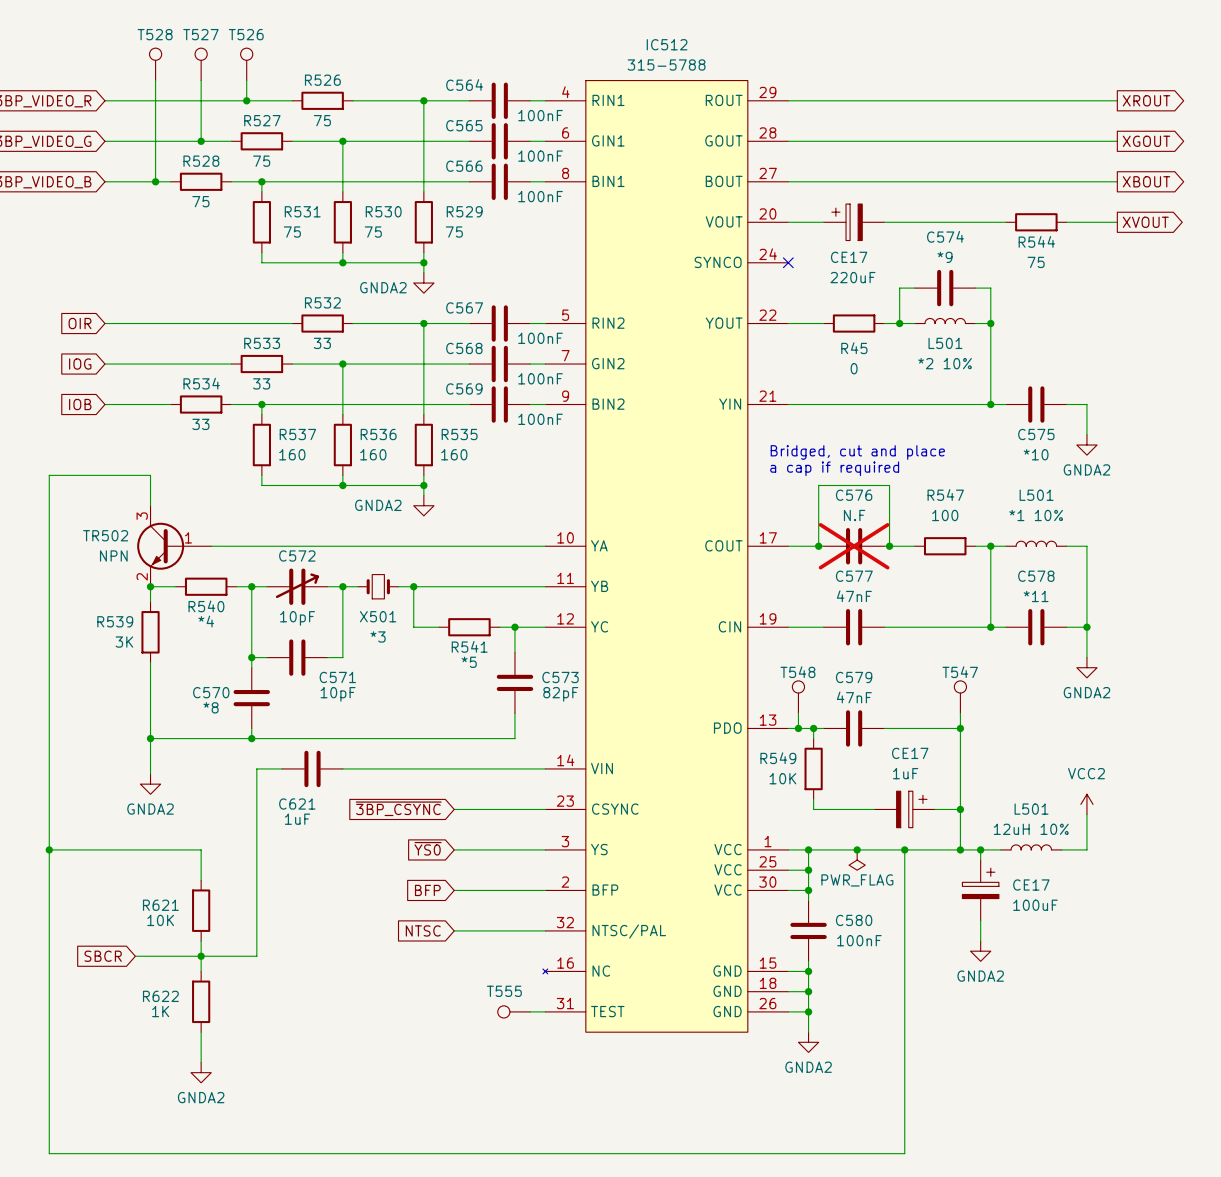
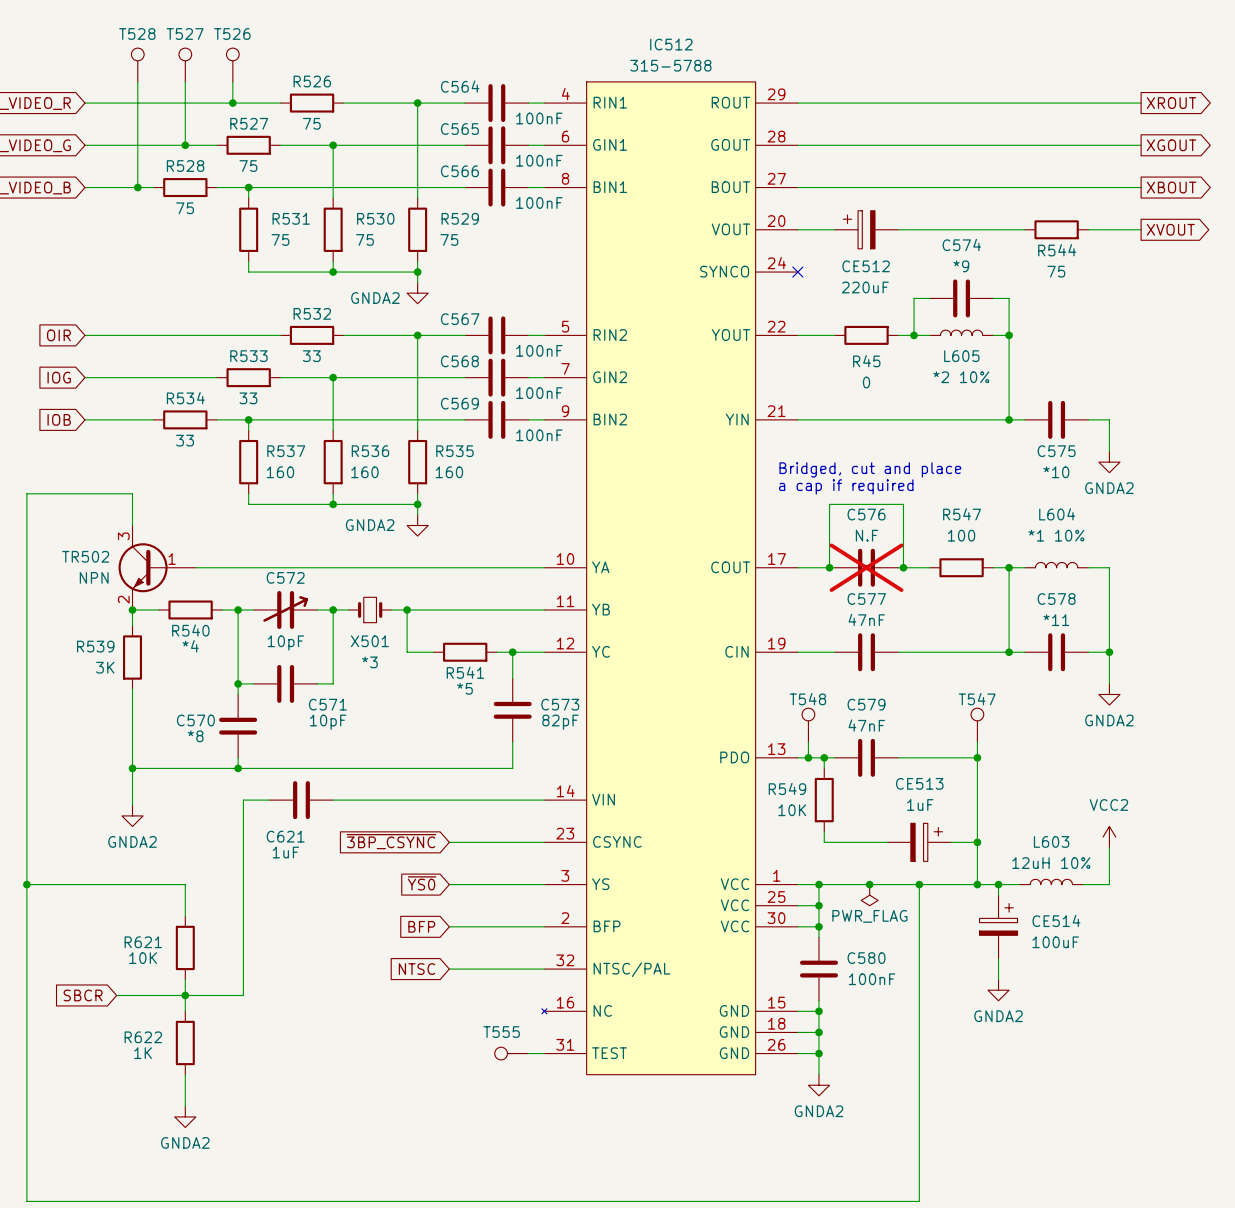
CE17 name: CE17 (849, 257) -> CE512 (866, 266)
L501 name: L501 (945, 343) -> L605 (961, 356)
L501 name: L501 (1036, 495) -> L604 (1057, 514)
CE17 name: CE17 (910, 753) -> CE513 (919, 783)
L501 name: L501 (1031, 809) -> L603 (1051, 841)
CE17 name: CE17 (1031, 885) -> CE514 (1056, 920)

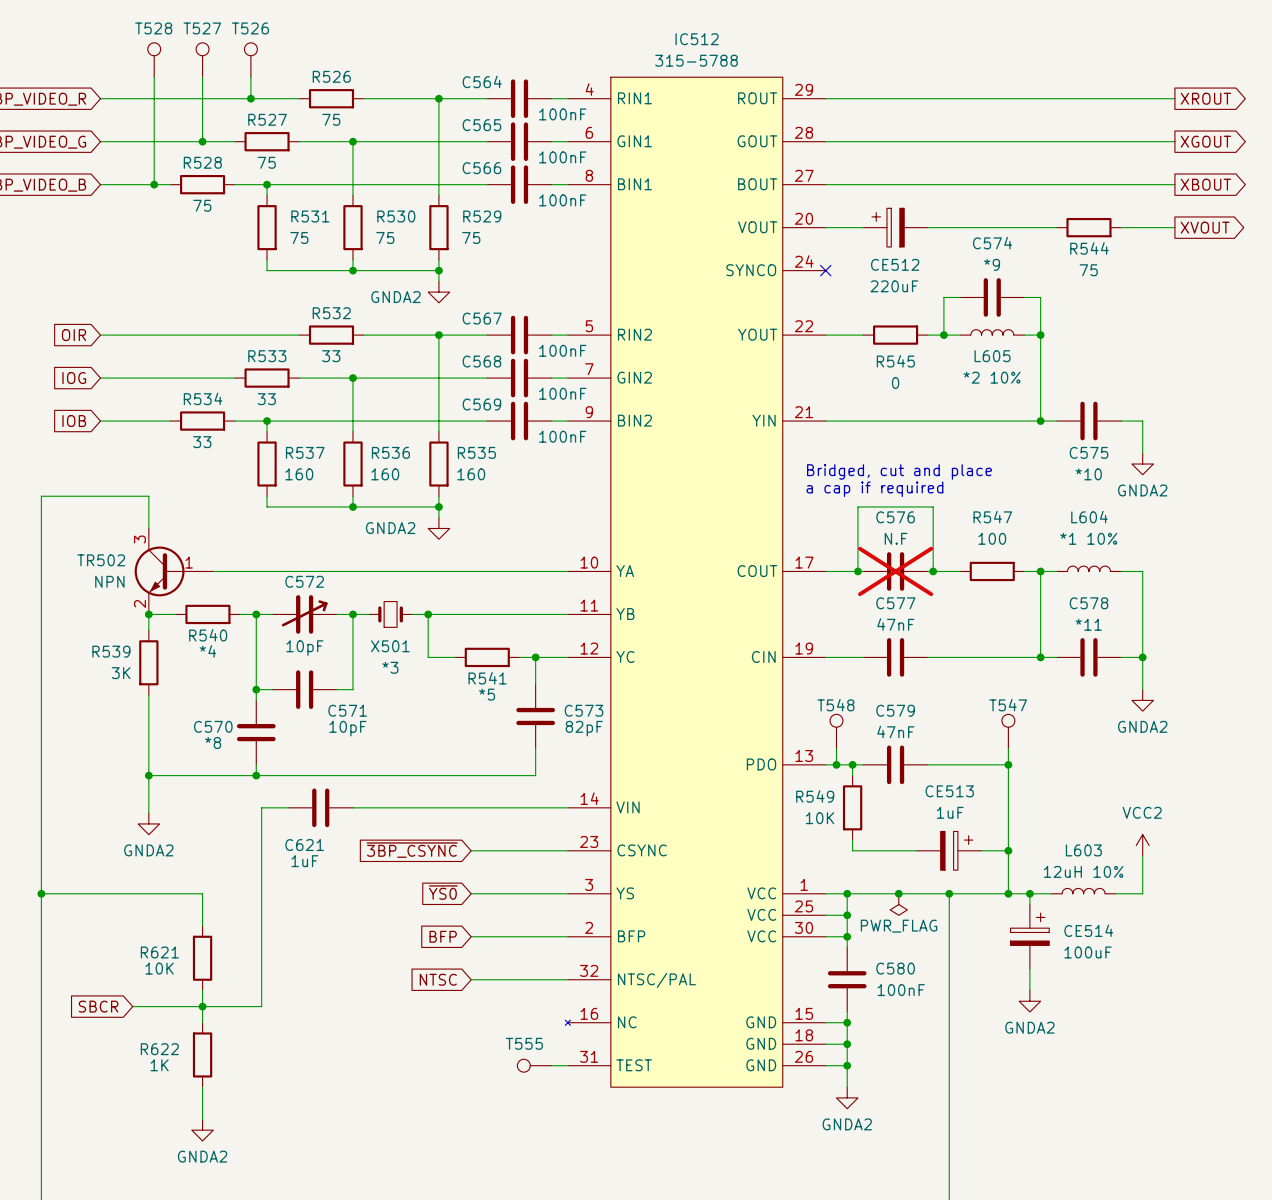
R45 name: R45 (866, 361) -> R545 (895, 361)

